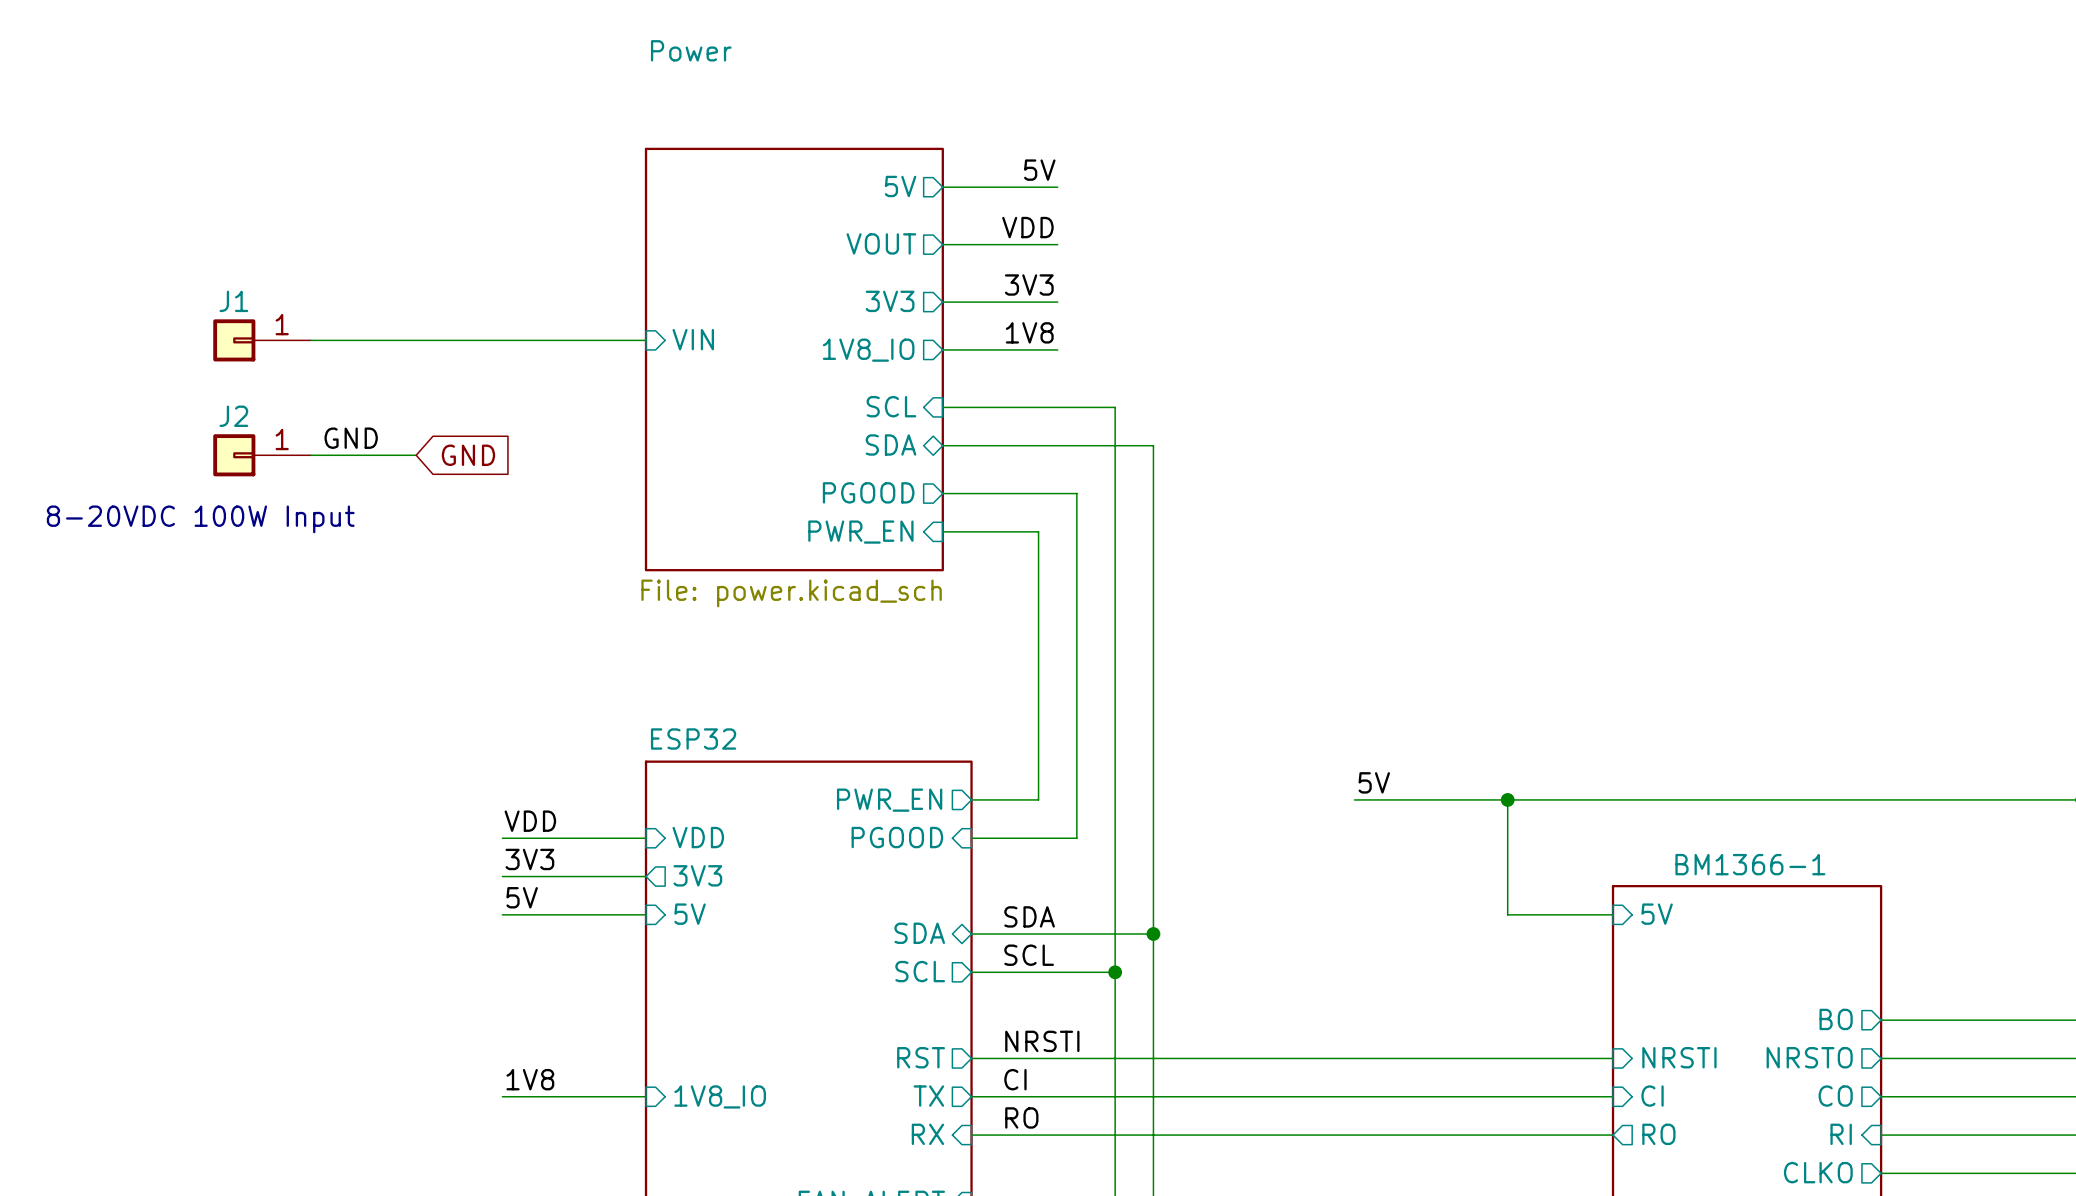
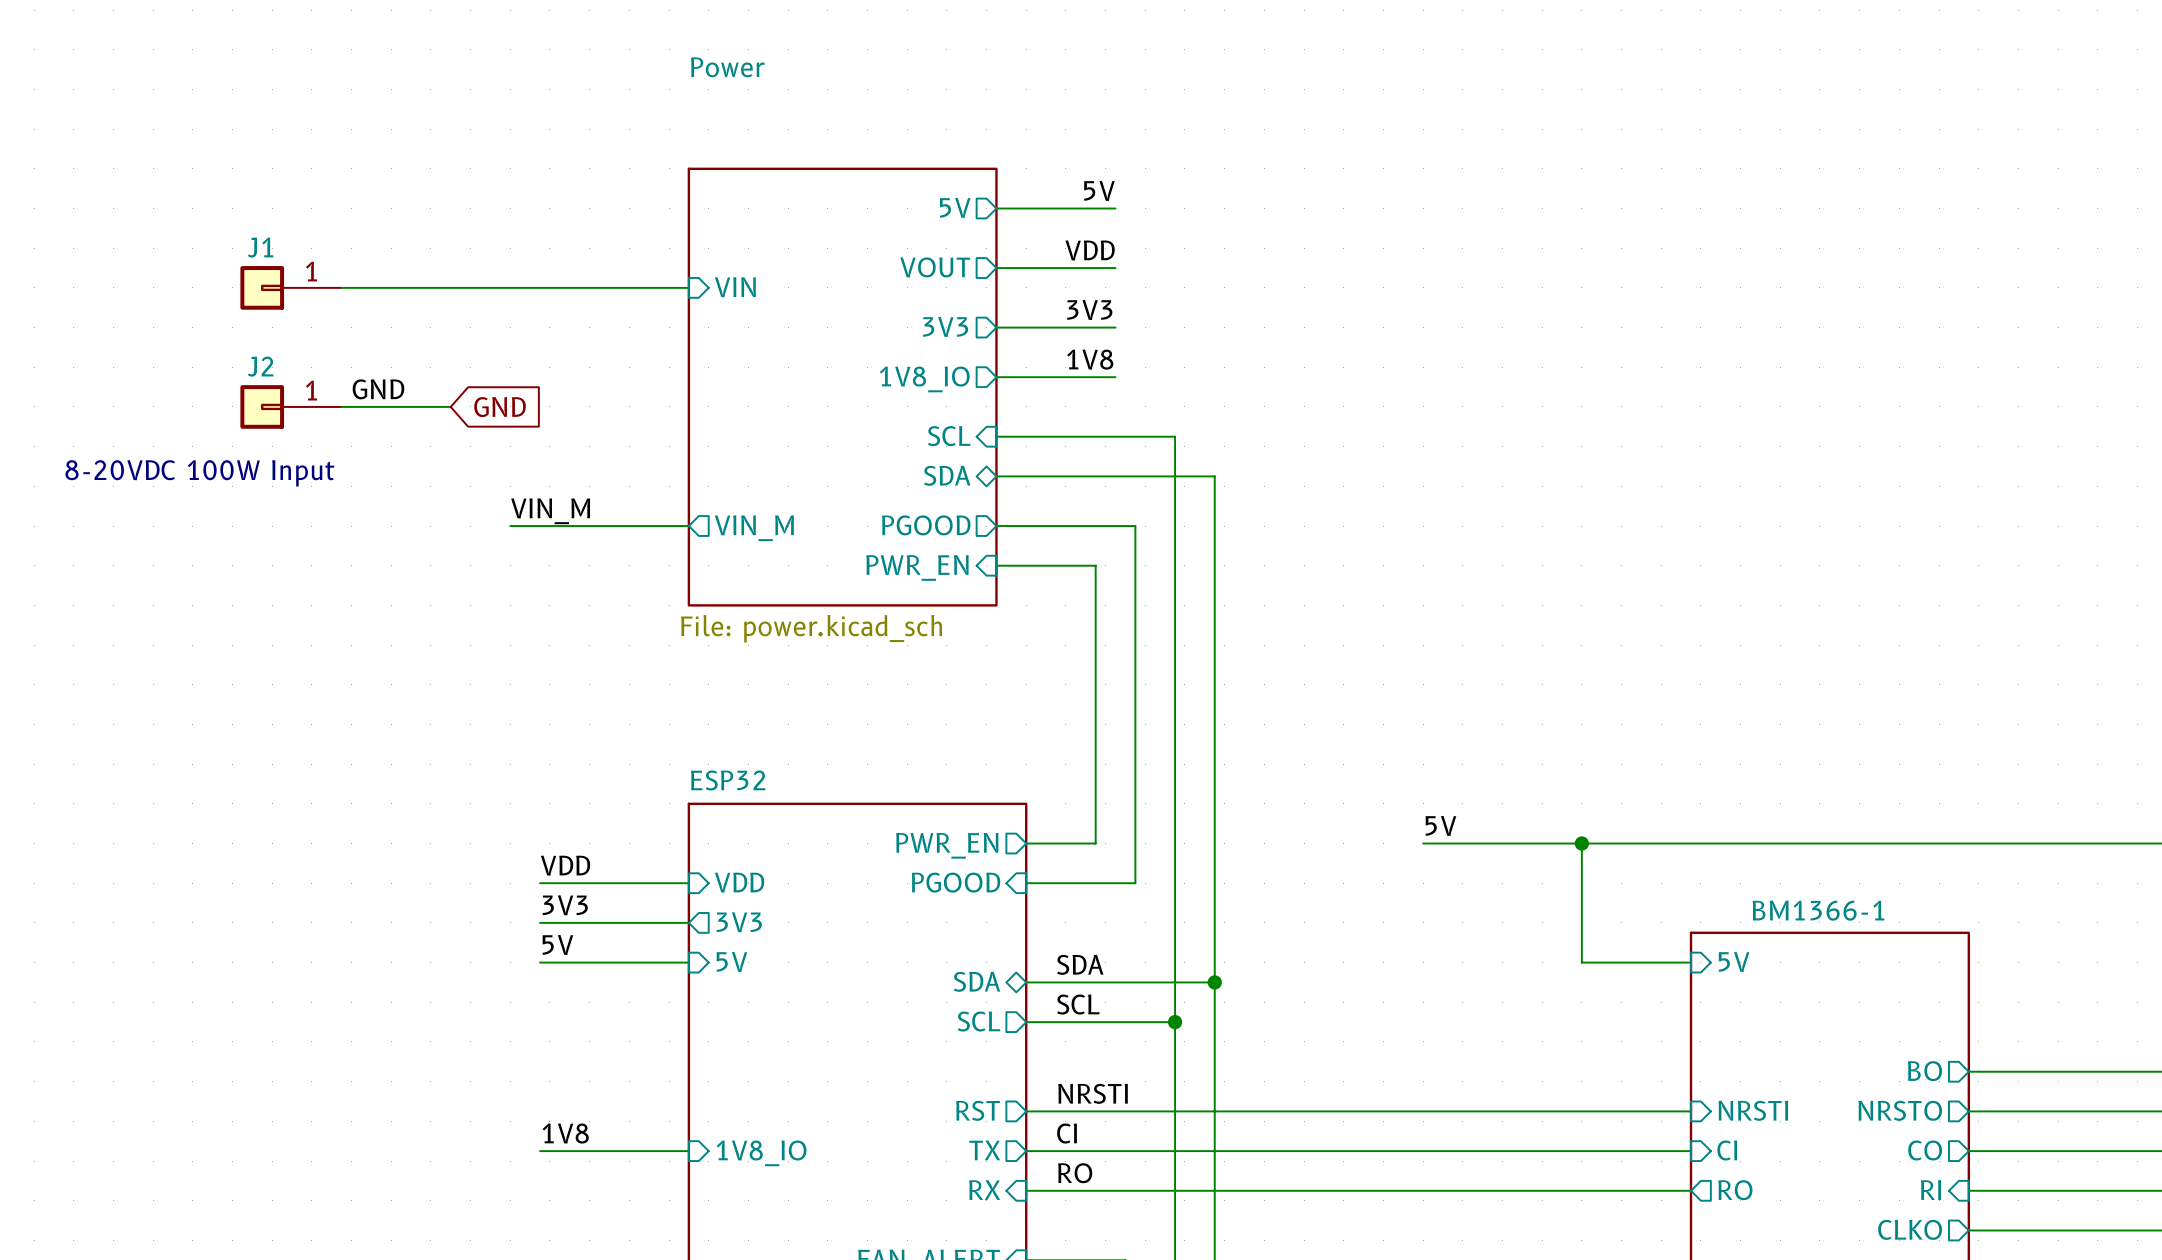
sheet pin position: VIN (693, 339) -> VIN (735, 287)
J1 position: (262, 340) -> (291, 287)
wire: (310, 340) (646, 340) -> (341, 287) (688, 287)
label position: GND (351, 438) -> GND (378, 389)
J2 position: (262, 455) -> (291, 406)
wire: (310, 455) (416, 455) -> (341, 406) (450, 406)
global label position: GND (468, 455) -> GND (500, 407)
label: none -> VIN_M (550, 511)
wire: none -> (510, 526) (688, 526)
sheet pin: none -> VIN_M (754, 528)
text position: 8-20VDC 100W Input (200, 519) -> 8-20VDC 100W Input (199, 473)

